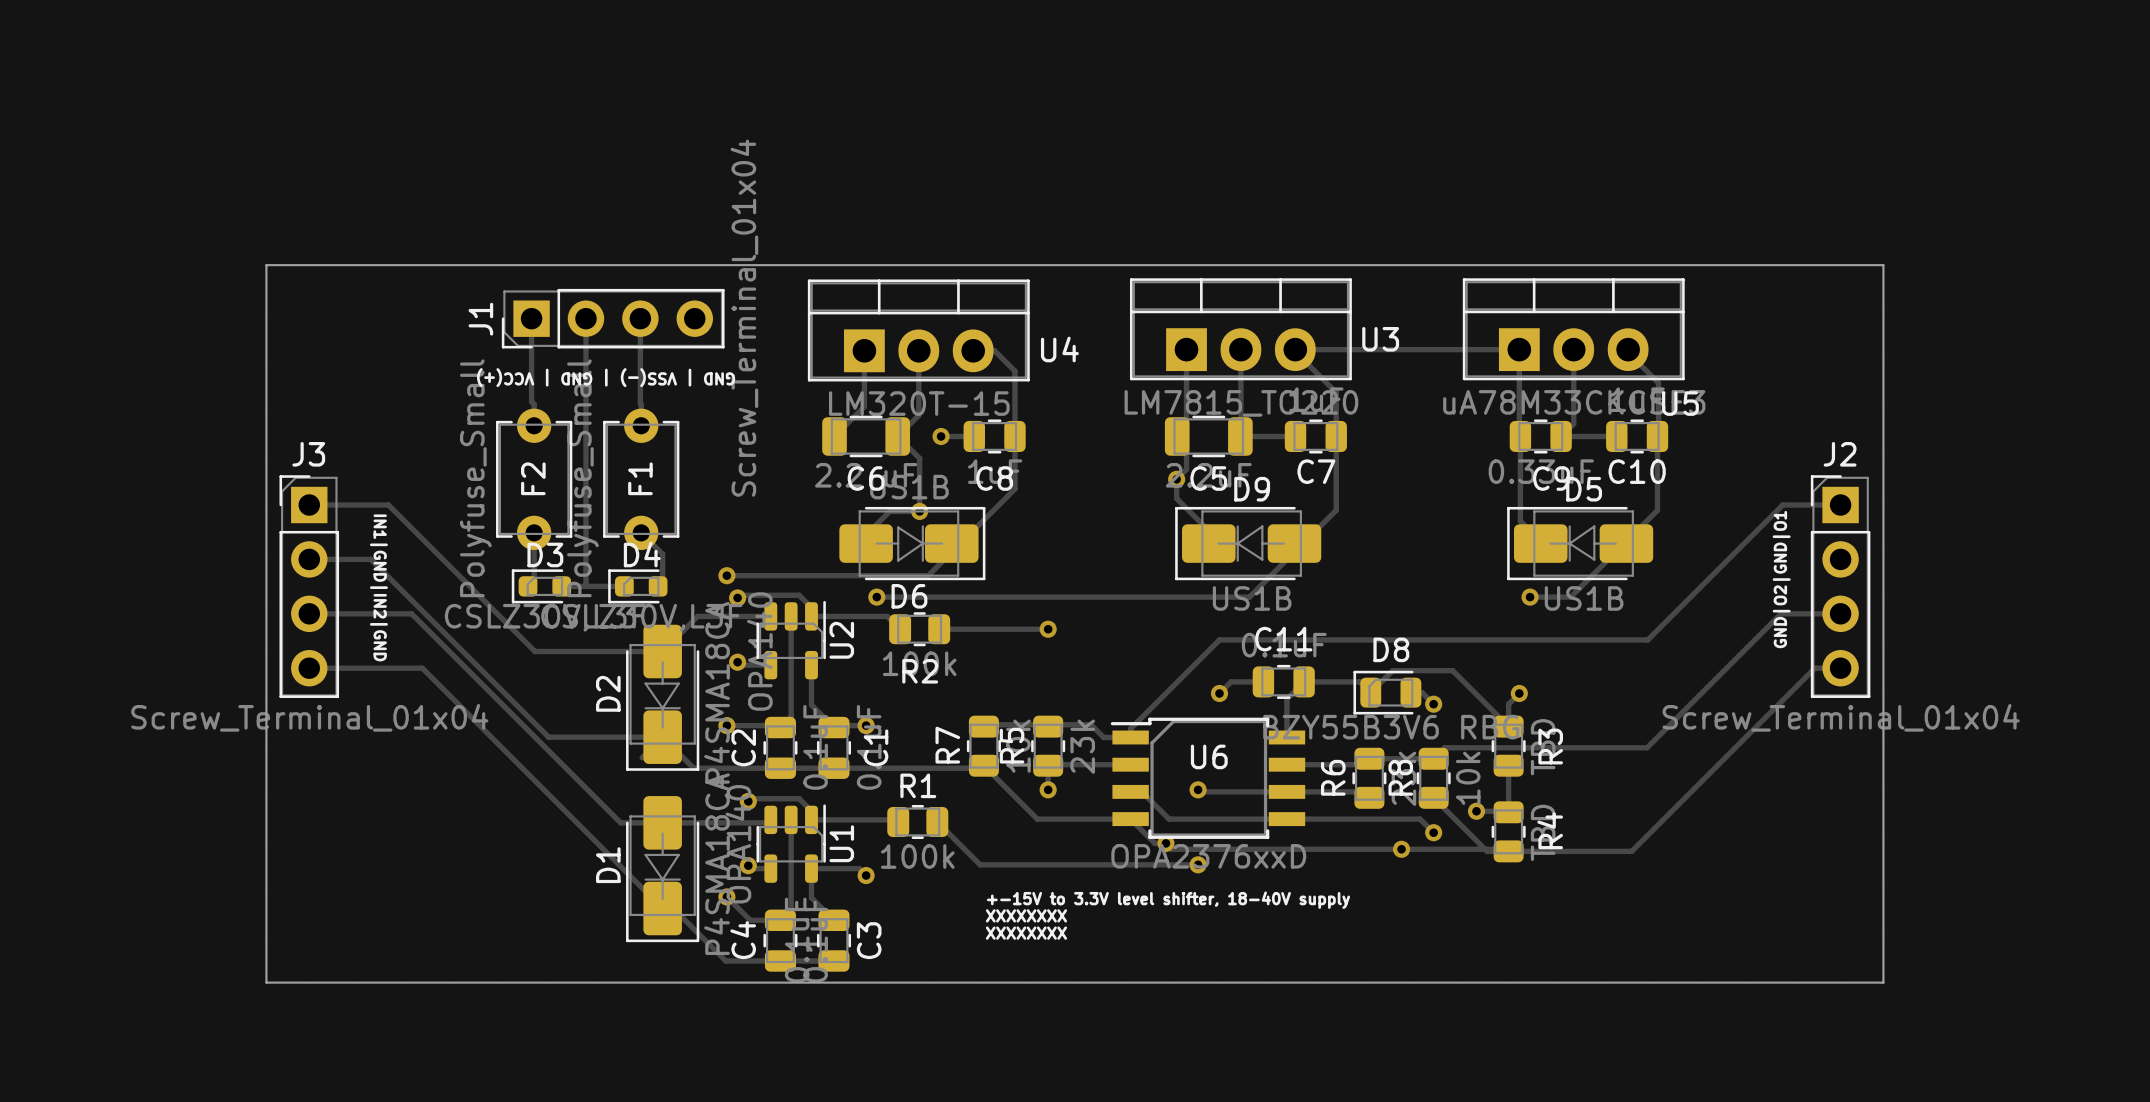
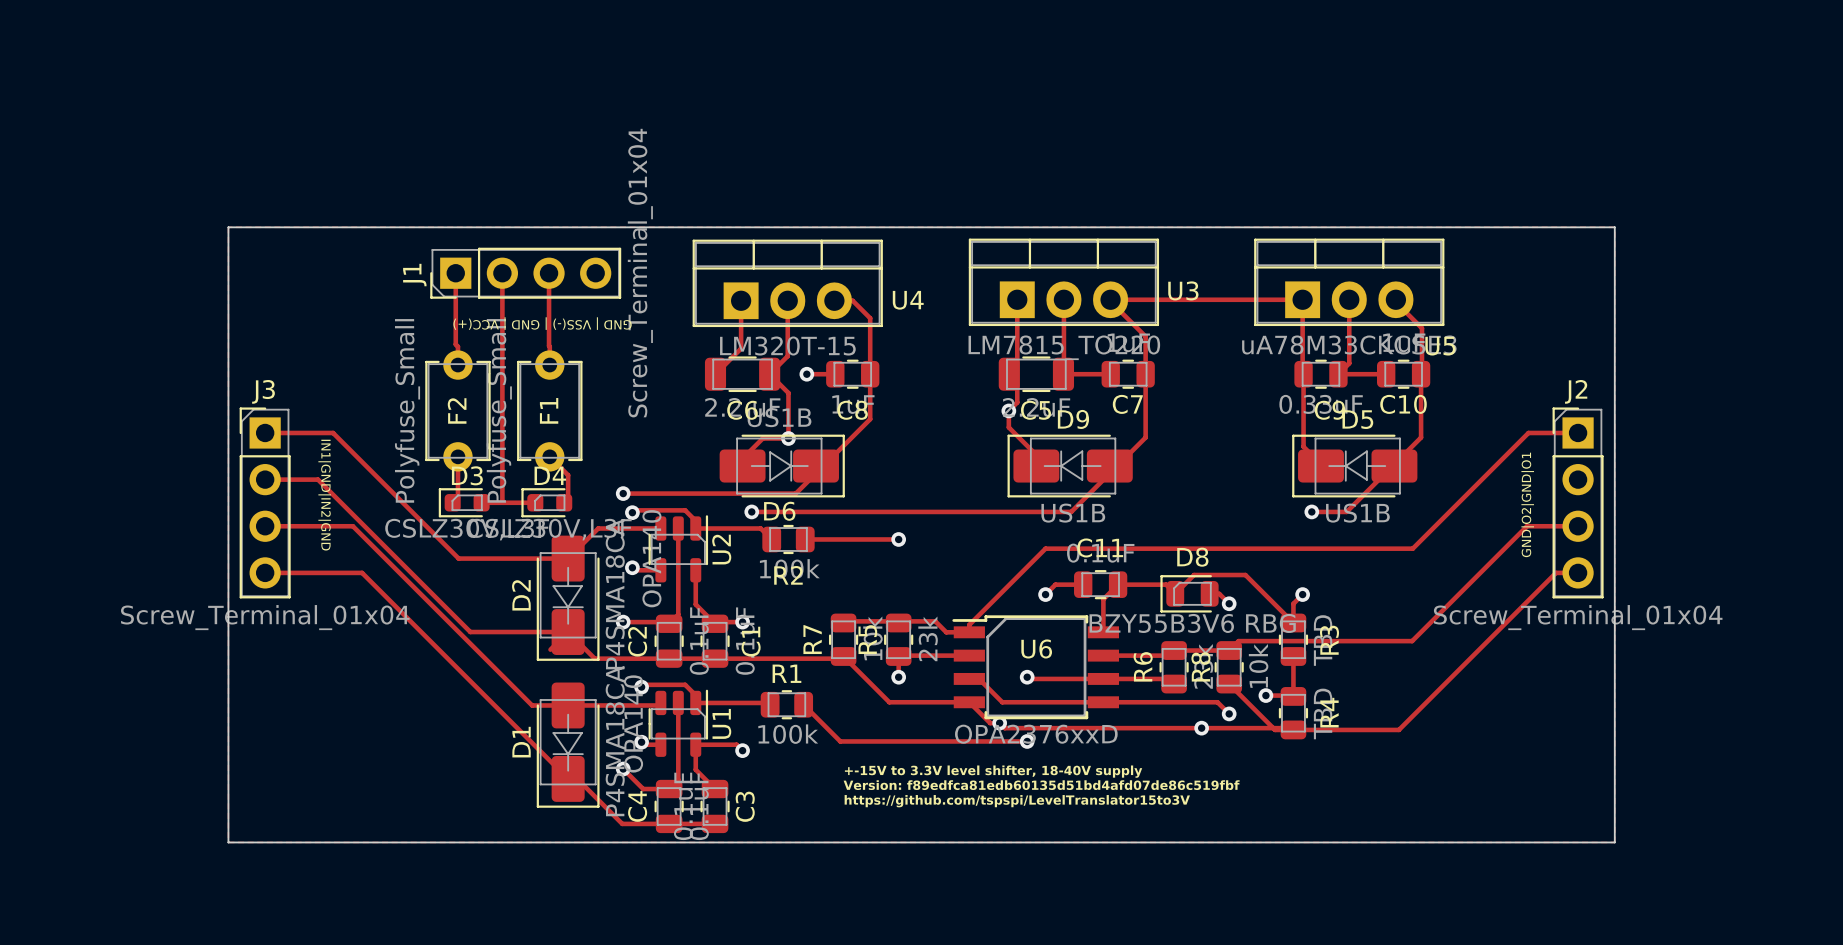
text: XXXXXXXX (1026, 915) -> Version: f89edfca81edb60135d51bd4afd07de86c519fbf (1041, 785)
text: XXXXXXXX (1026, 933) -> https://github.com/tspspi/LevelTranslator15to3V (1017, 801)

